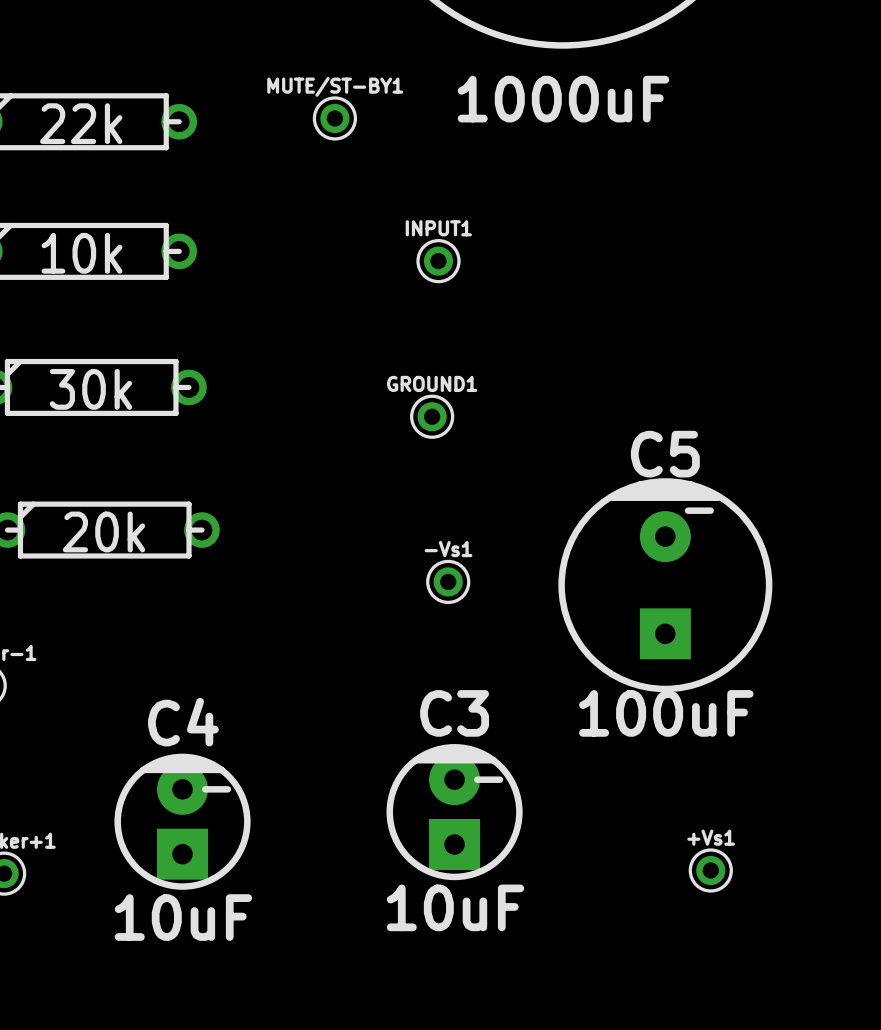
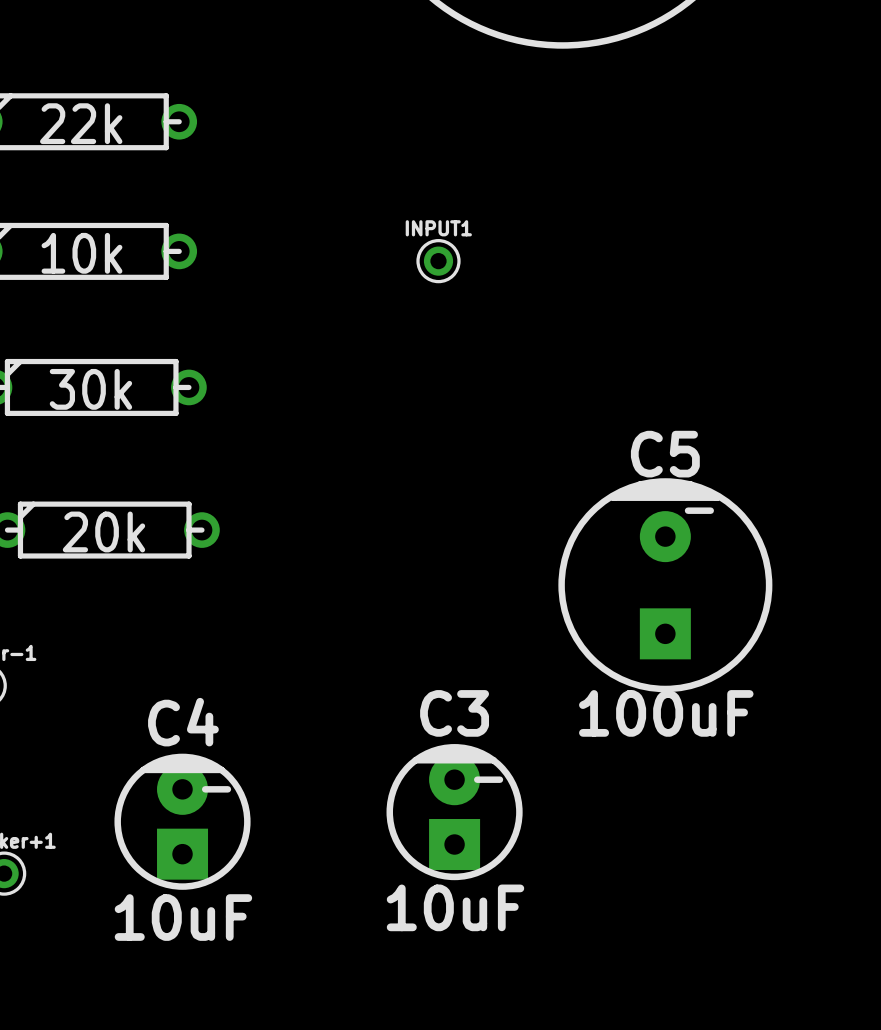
part value: 1000uF (563, 99) -> none
MUTE/ST-BY1: (334, 118) -> none
GROUND1: (432, 416) -> none
-Vs1: (448, 581) -> none
+Vs1: (710, 870) -> none

